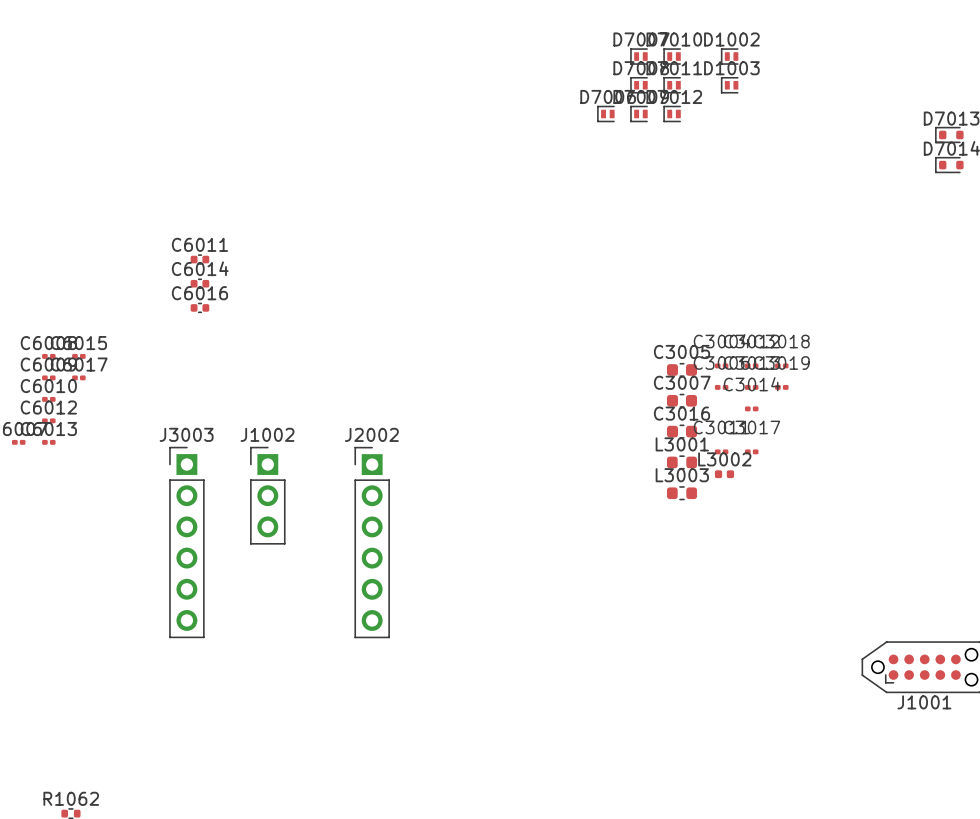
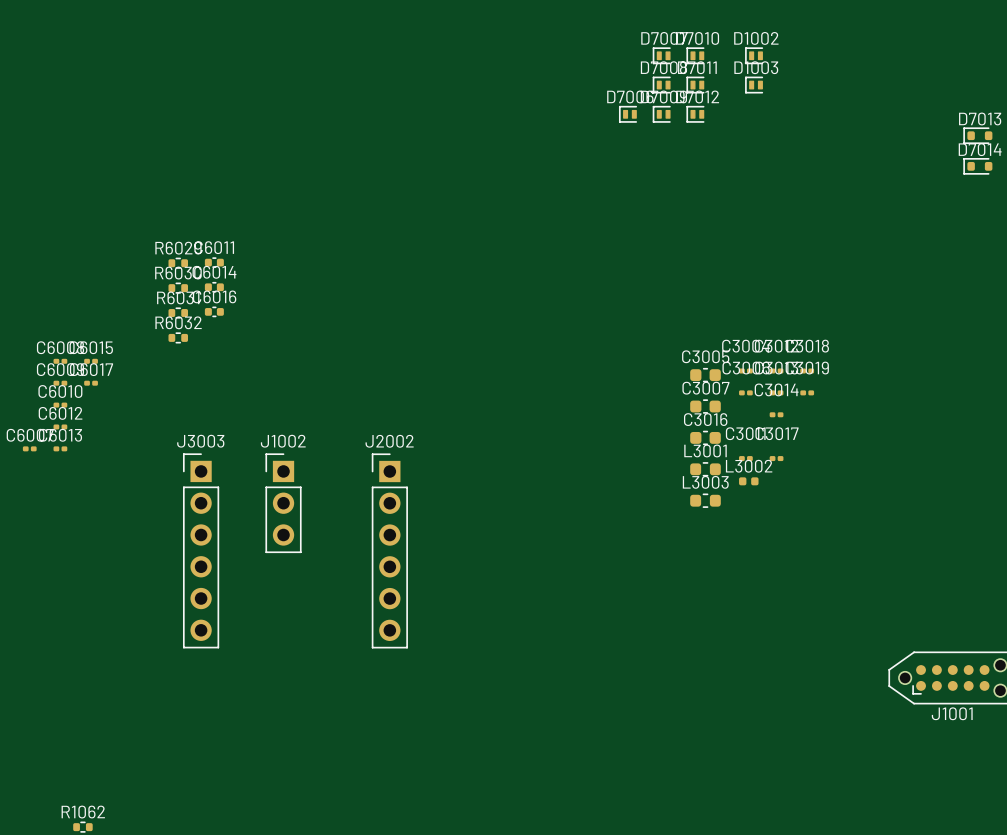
R6029: none -> (178, 263)
R6030: none -> (178, 288)
R6031: none -> (178, 313)
R6032: none -> (178, 337)

